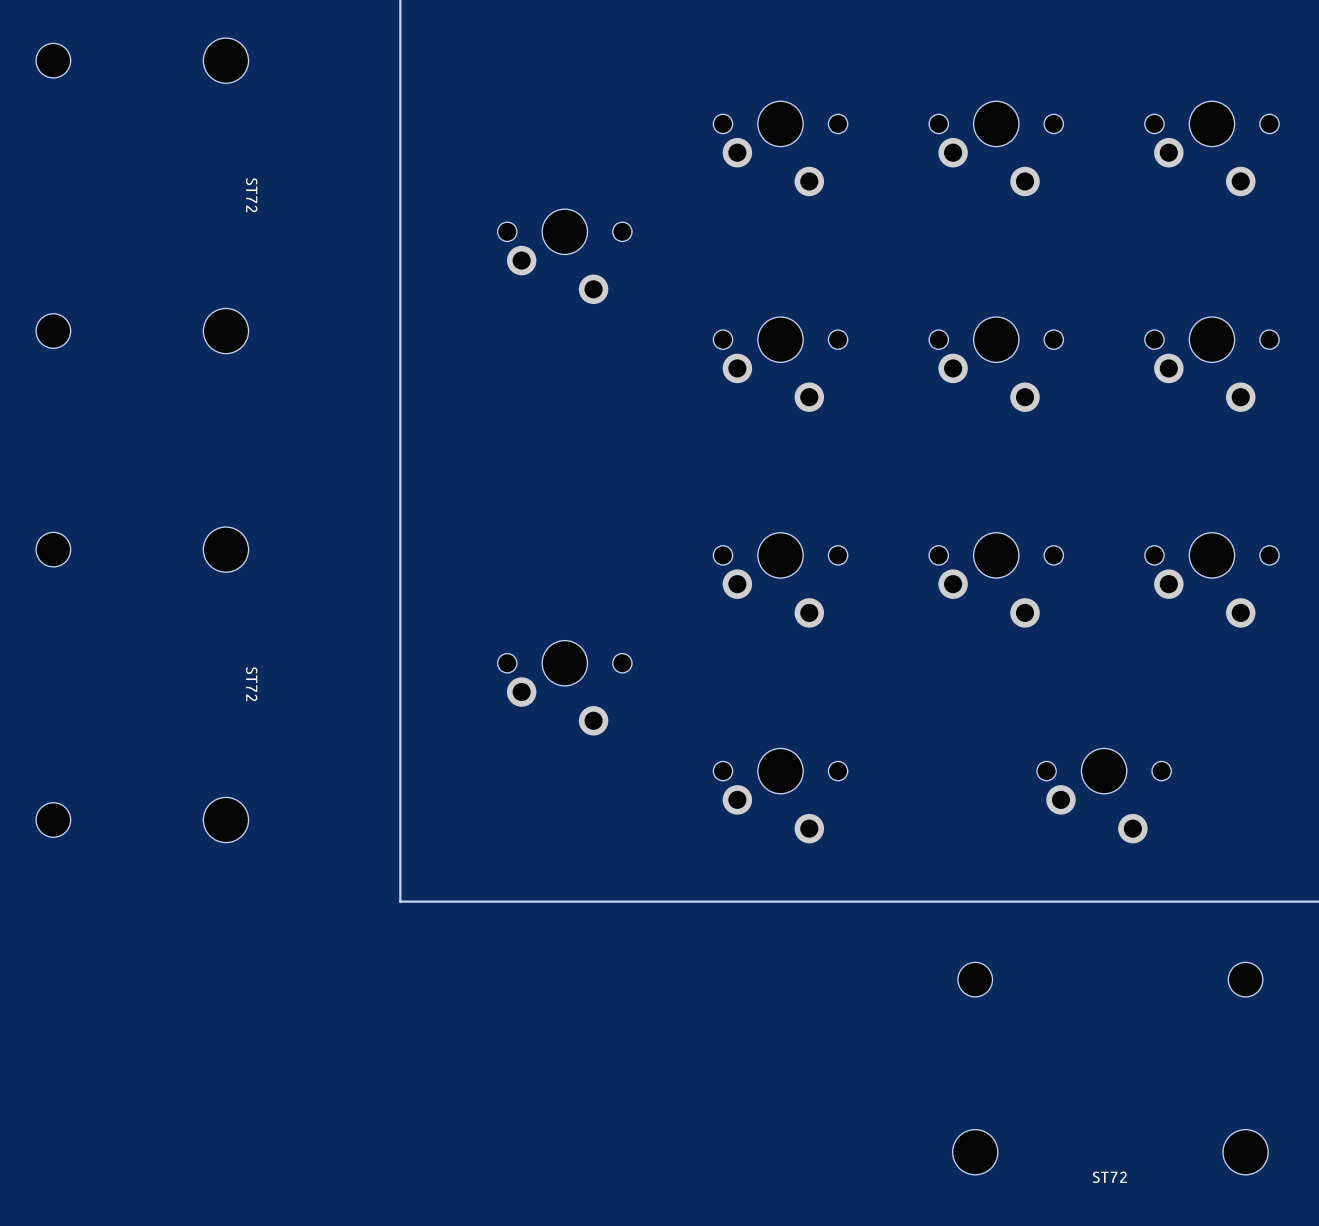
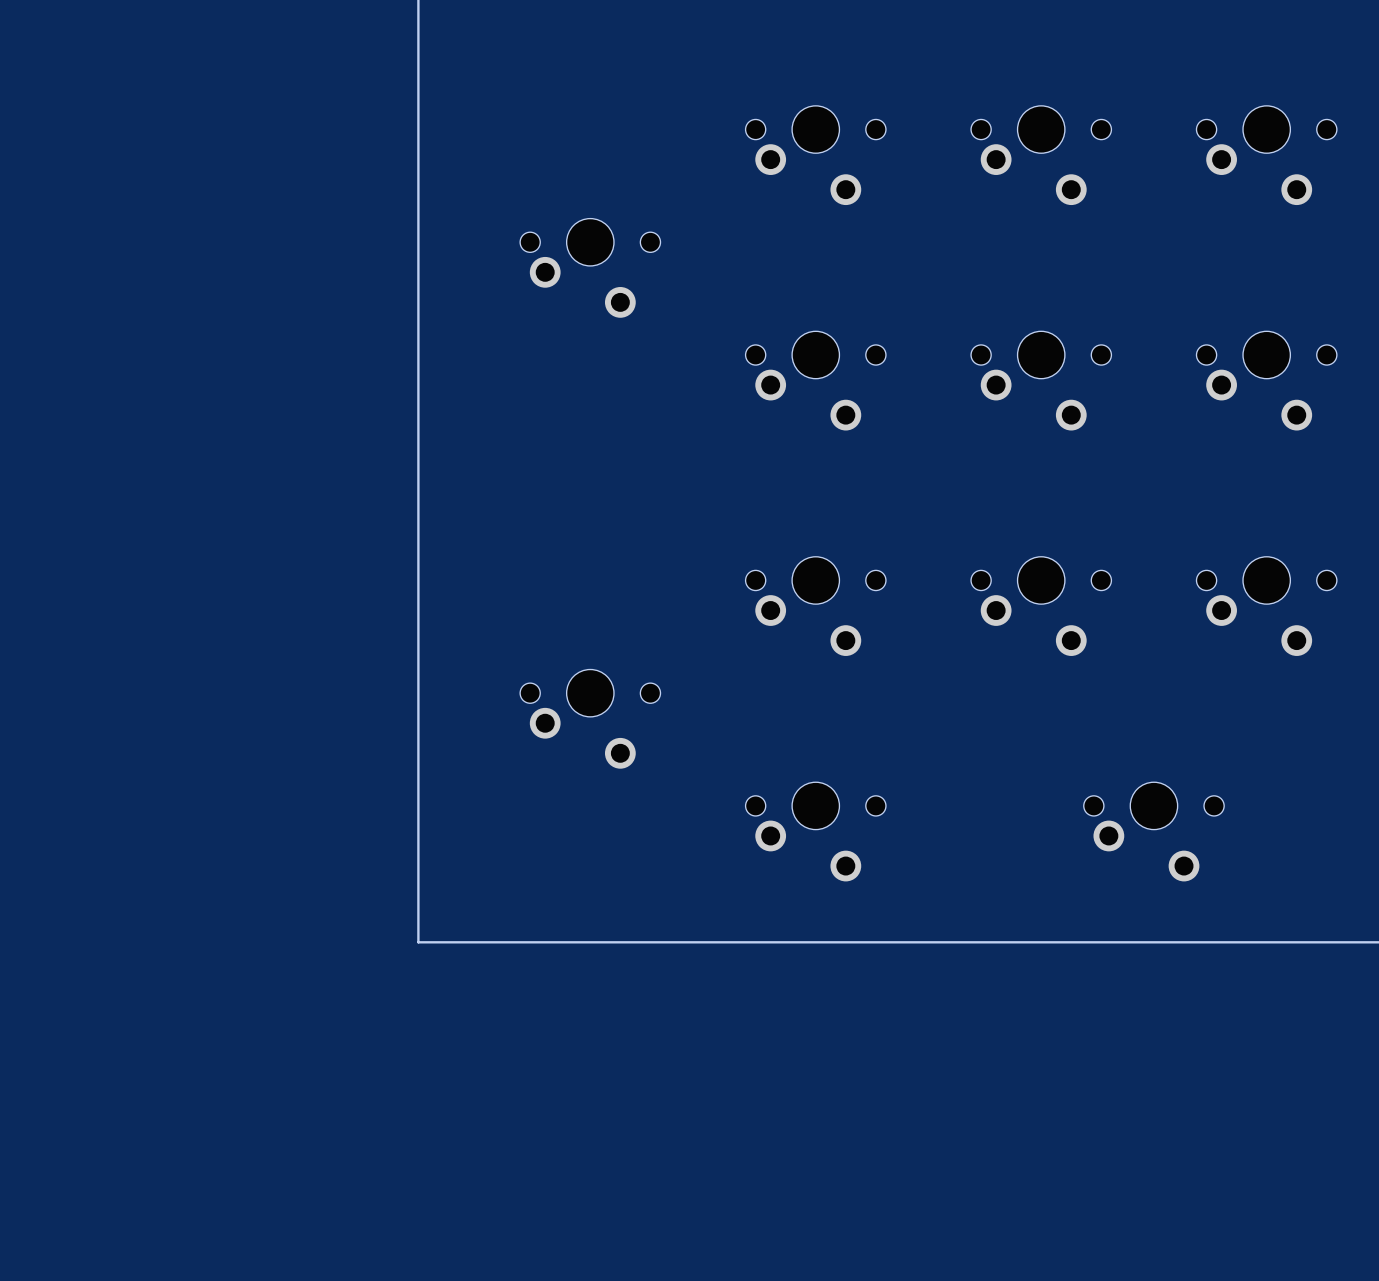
ST72: (142, 195) -> none
ST72: (142, 684) -> none
ST72: (1110, 1068) -> none

